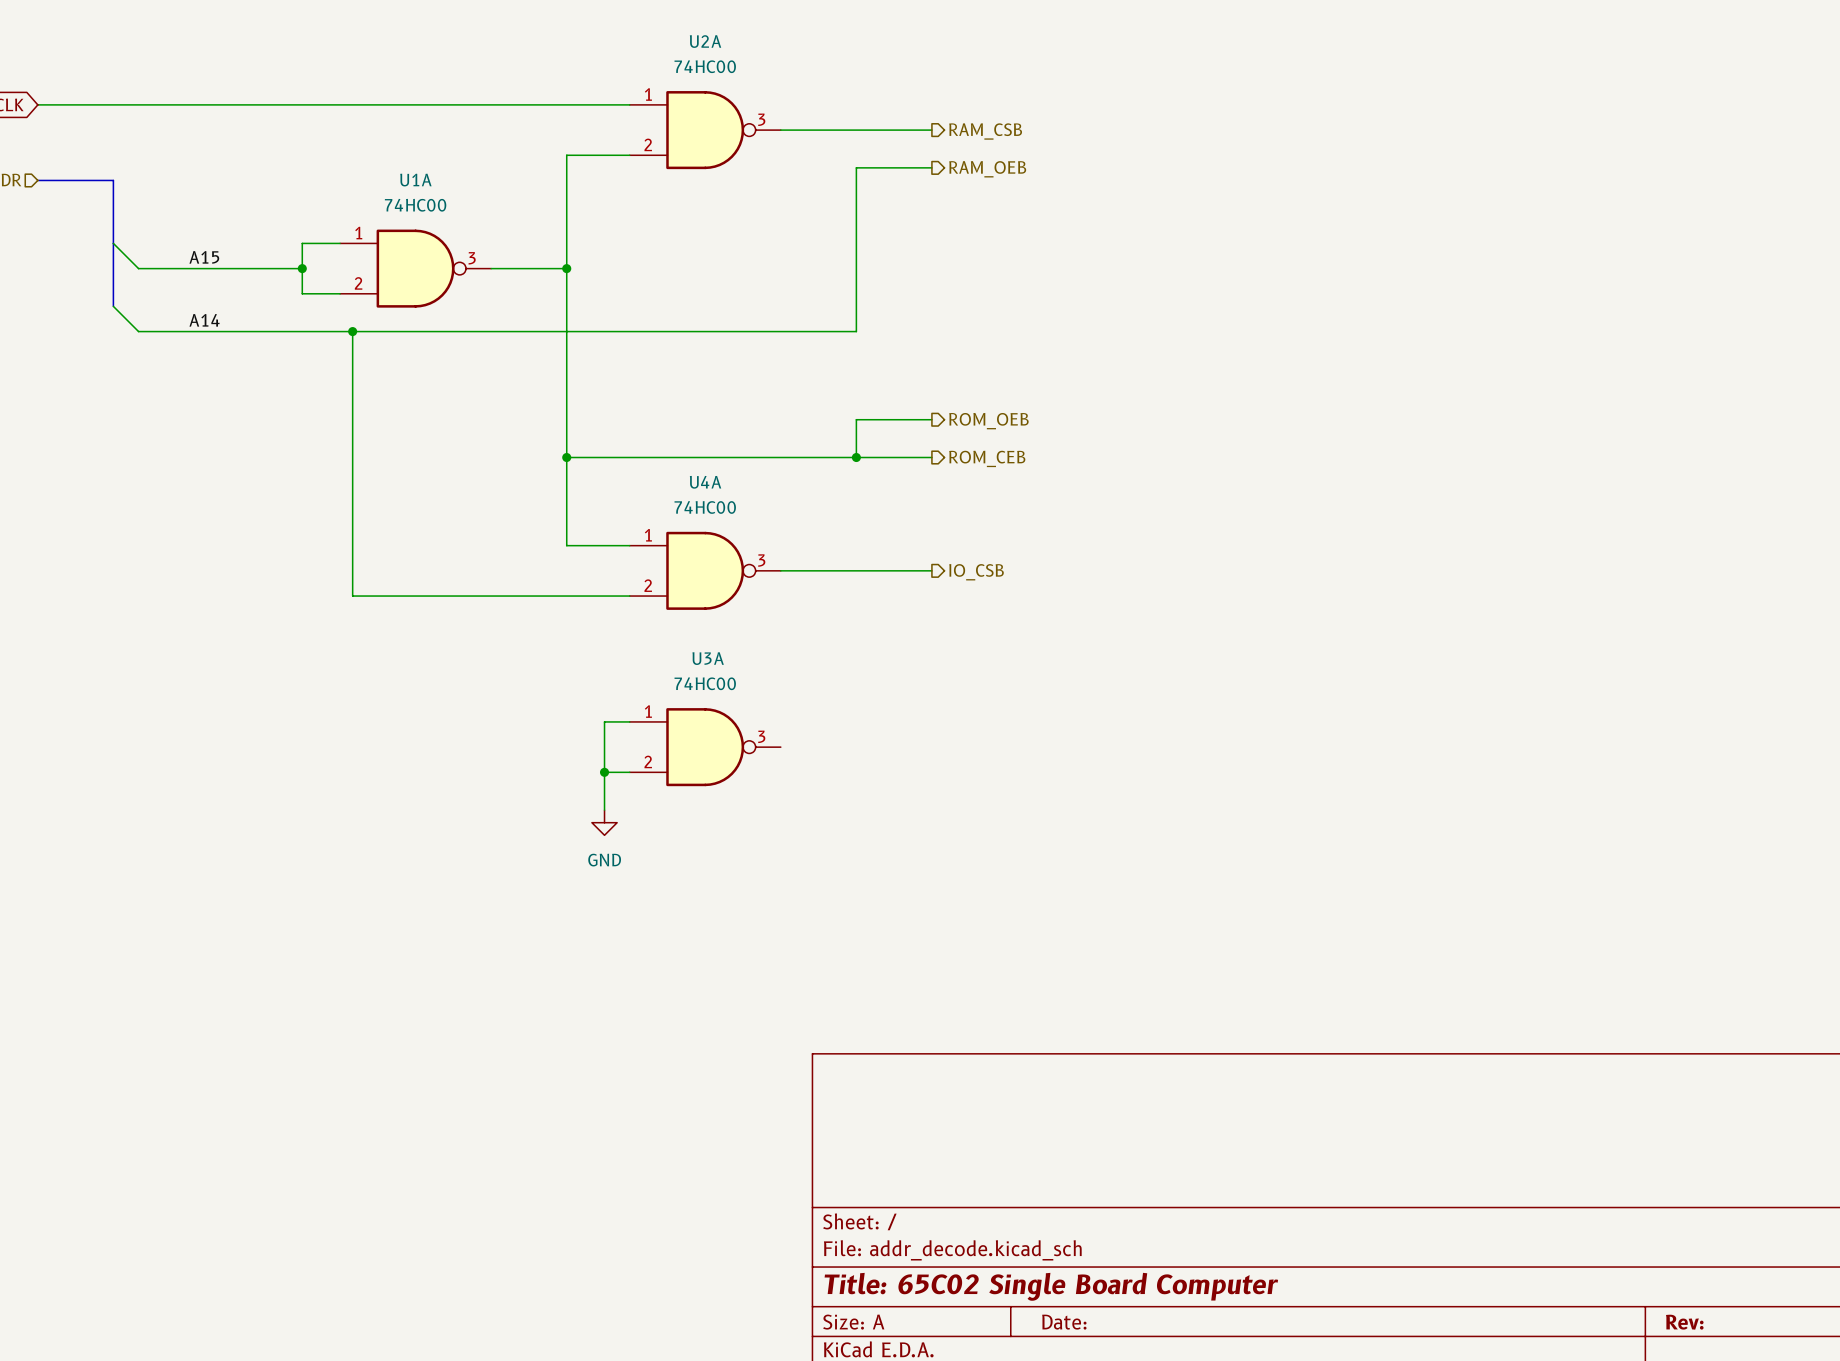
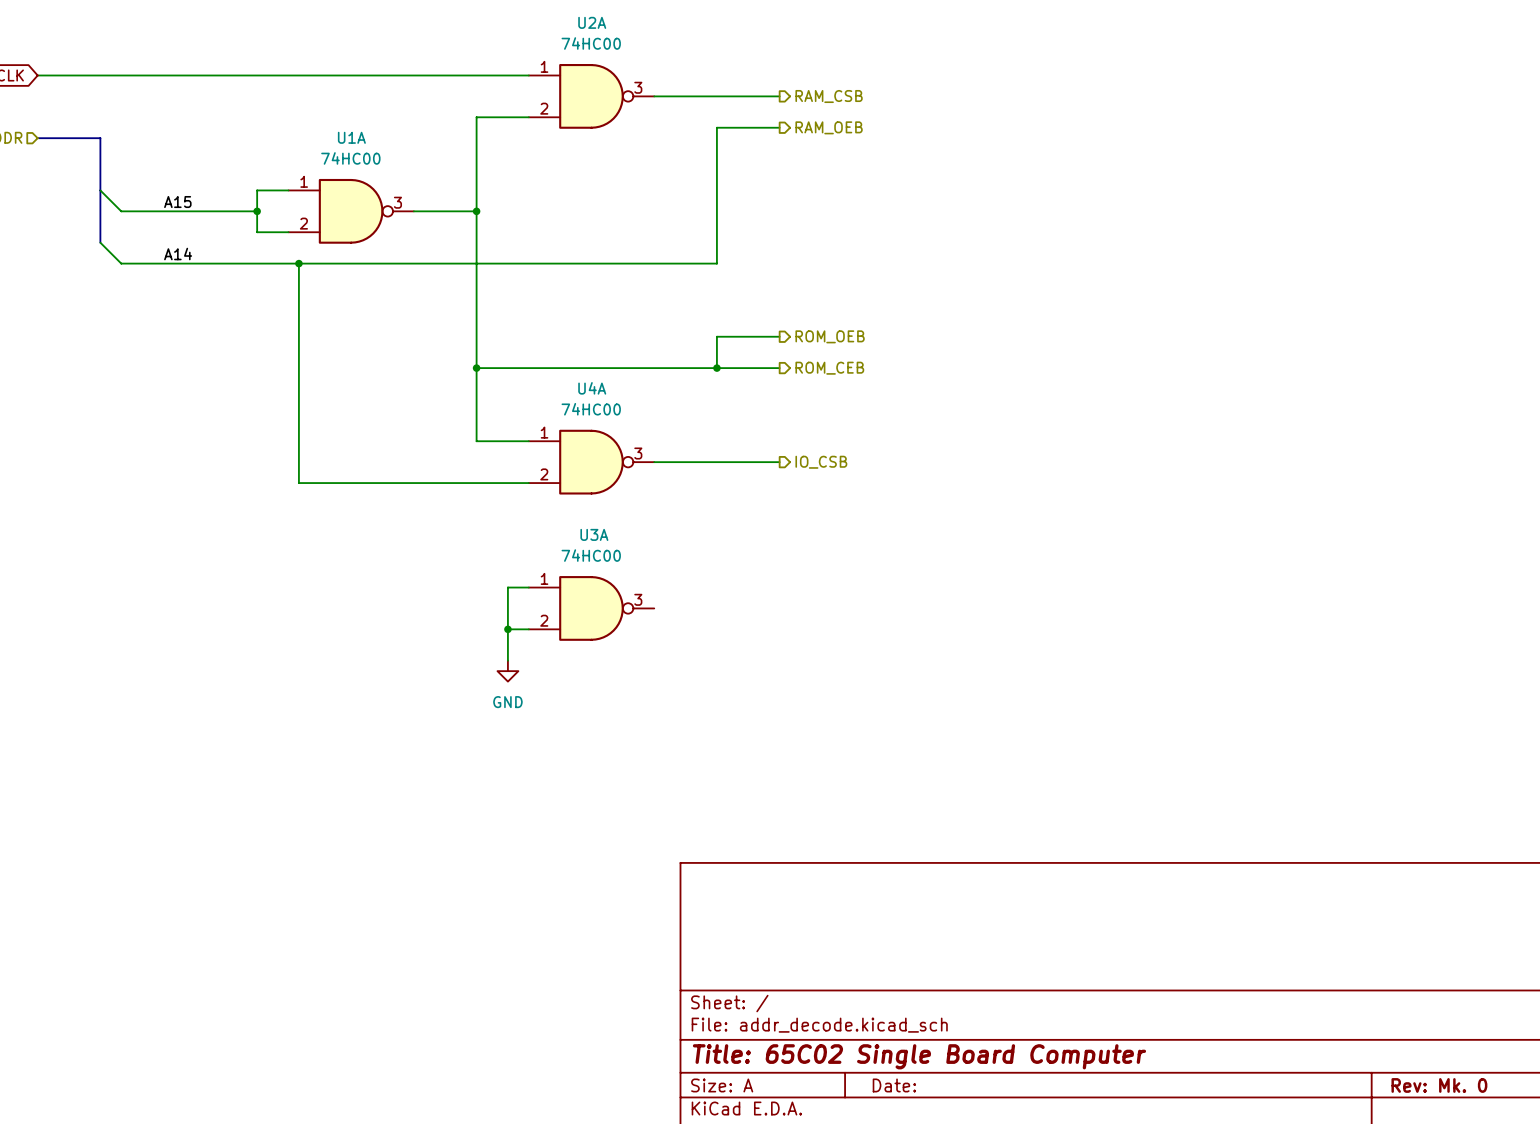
title block: Rev: (1684, 1322) -> Rev: Mk. 0 (1439, 1085)

